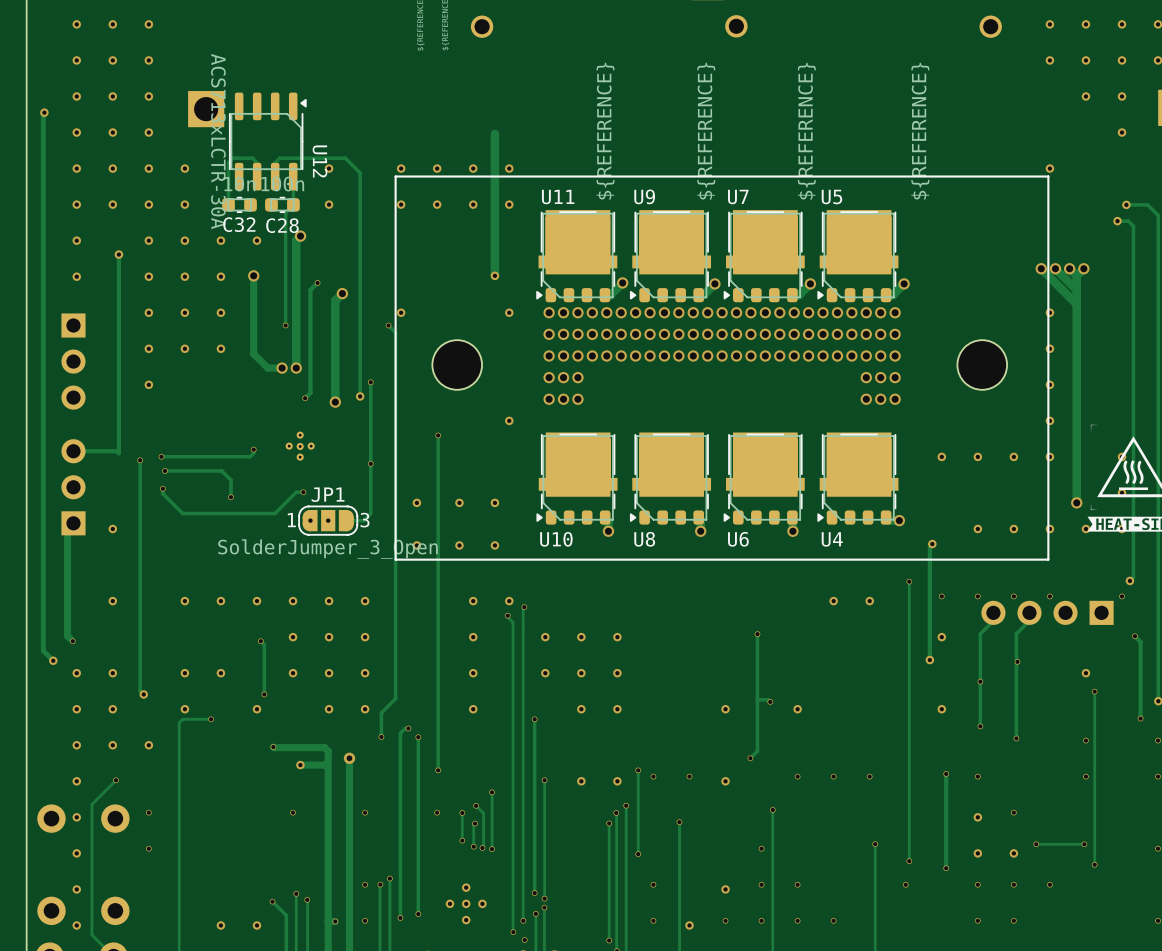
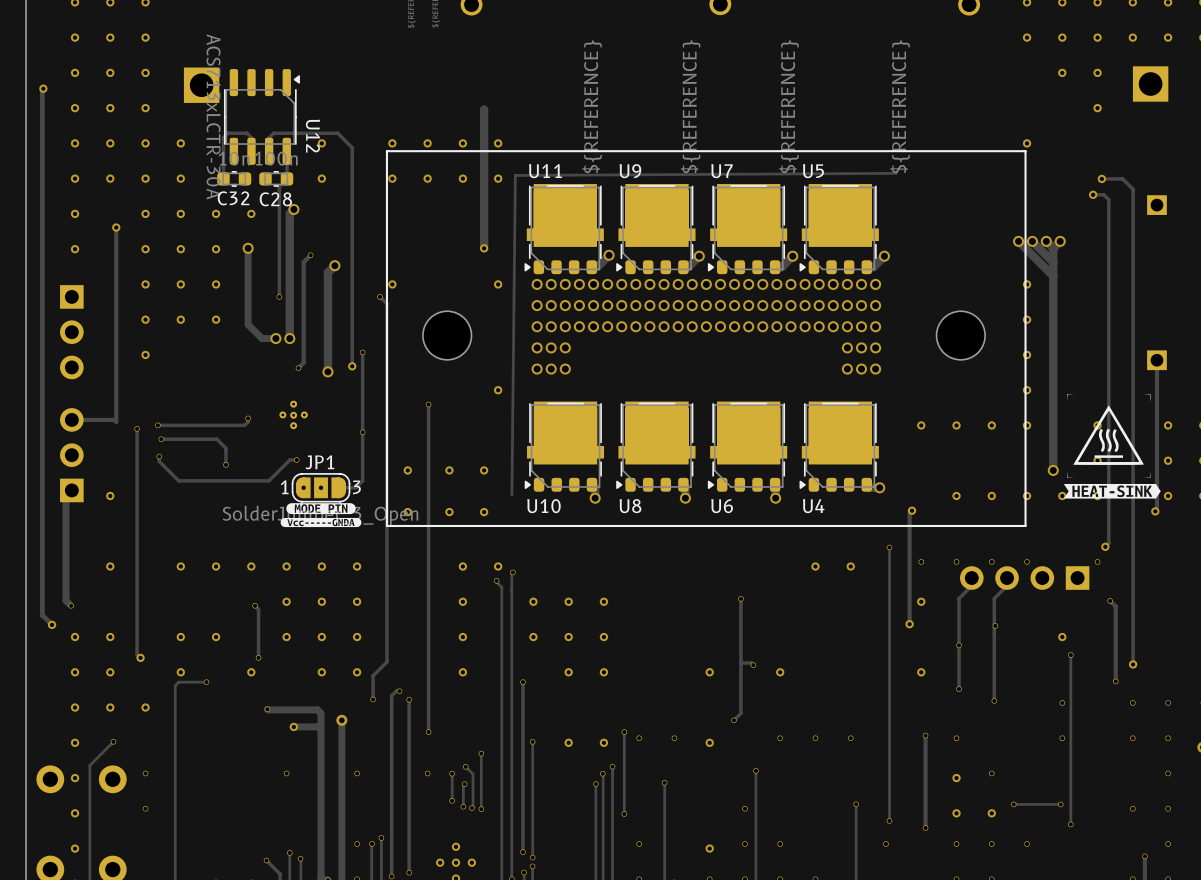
track: none -> (896, 173) (515, 175) (511, 494)
drawing: none -> [280, 503, 362, 528]

